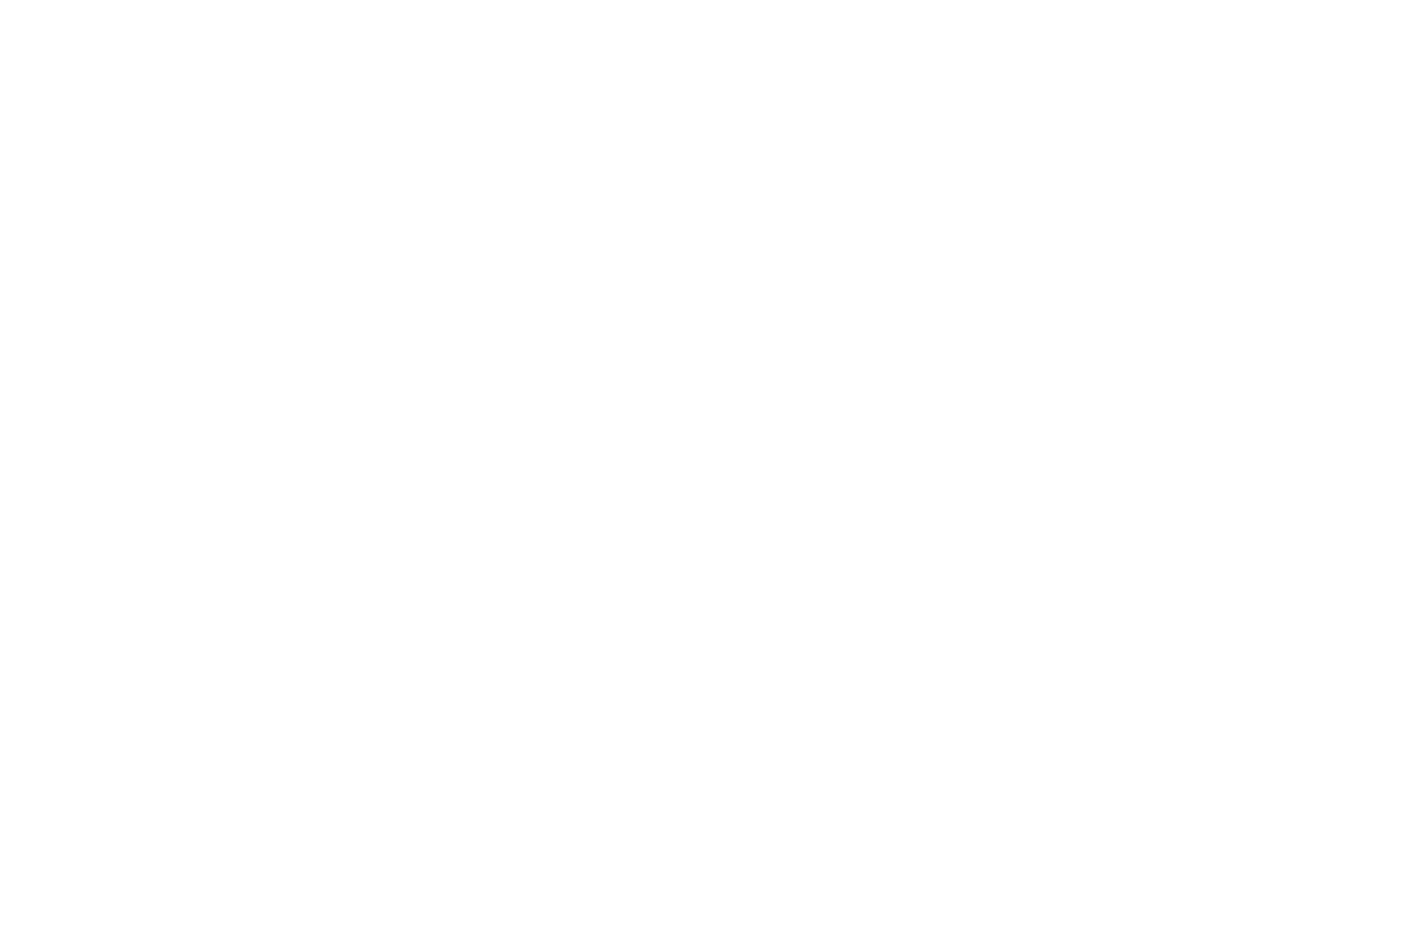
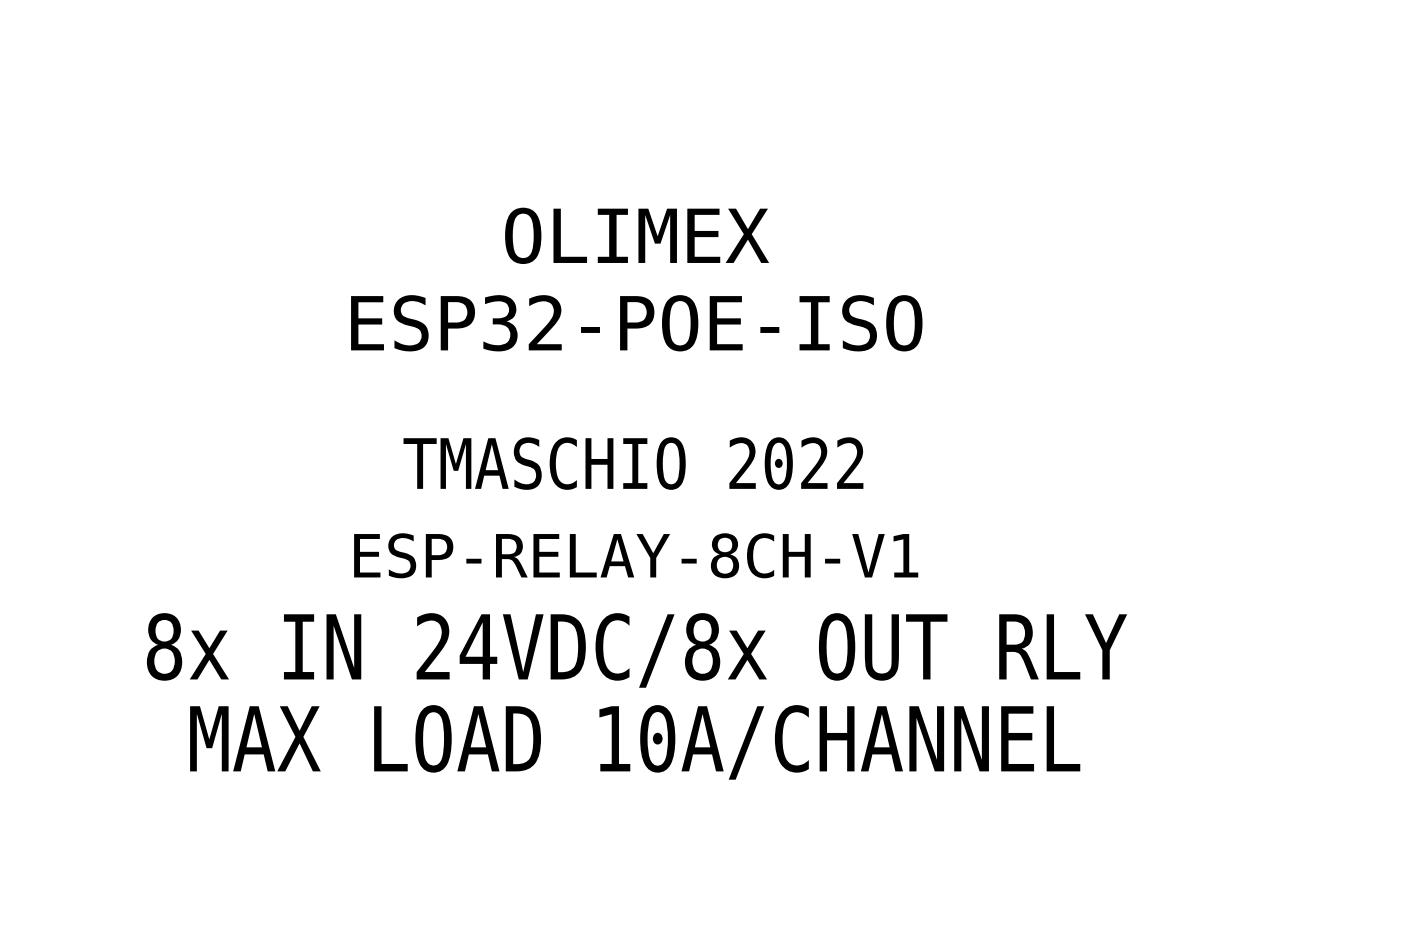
text: none -> OLIMEX (637, 235)
text: none -> ESP32-POE-ISO (636, 323)
text: none -> TMASCHIO 2022 (633, 463)
text: none -> ESP-RELAY-8CH-V1 (636, 555)
text: none -> 8x IN 24VDC/8x OUT RLY (637, 650)
text: none -> MAX LOAD 10A/CHANNEL (635, 742)

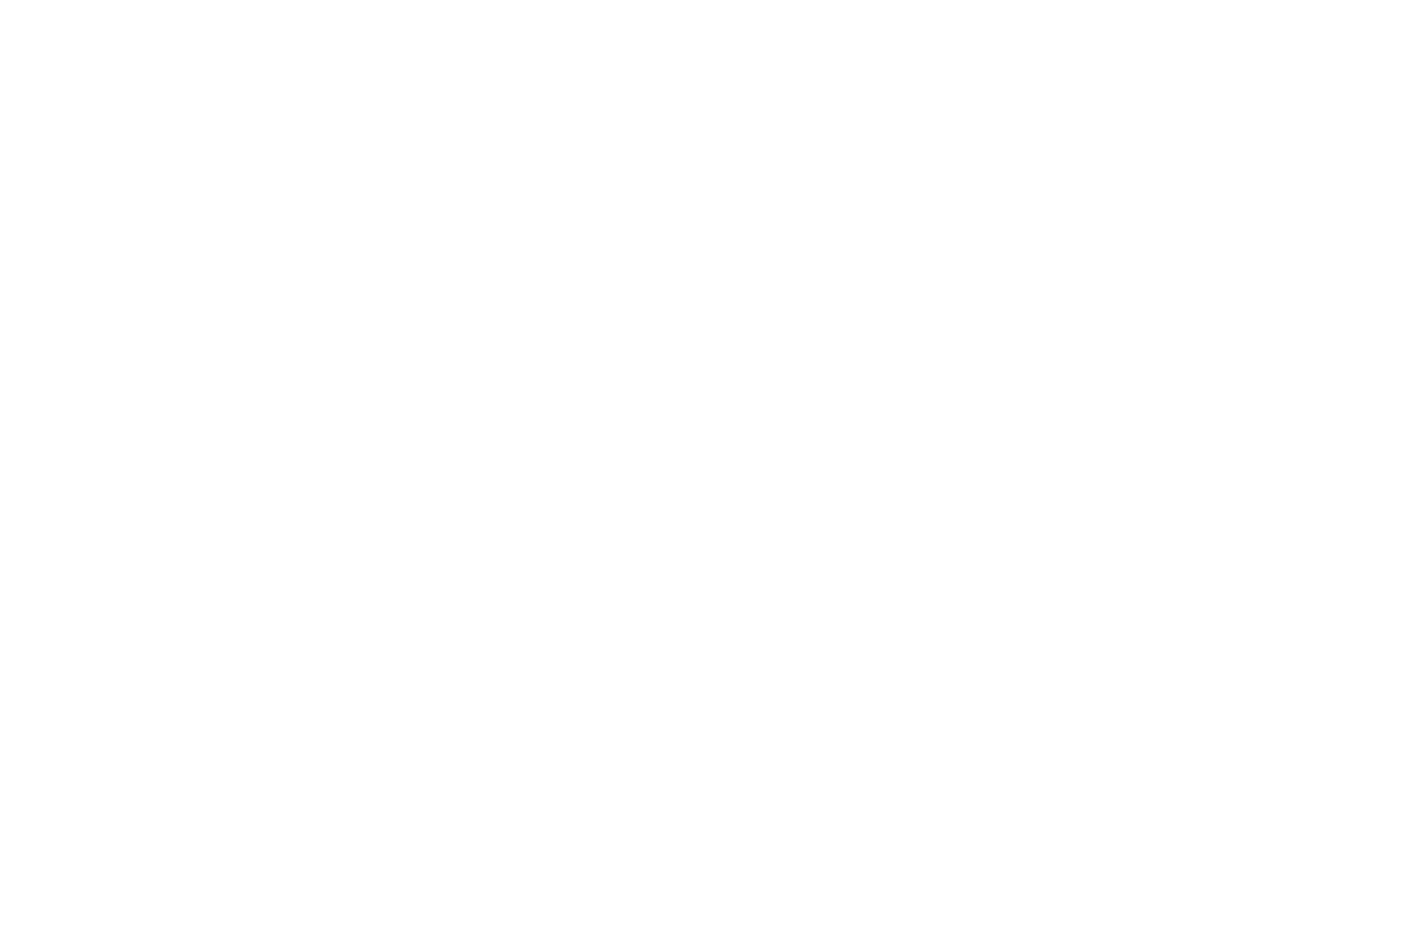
text: OLIMEX (637, 235) -> none
text: ESP32-POE-ISO (636, 323) -> none
text: TMASCHIO 2022 (633, 463) -> none
text: ESP-RELAY-8CH-V1 (636, 555) -> none
text: 8x IN 24VDC/8x OUT RLY (637, 650) -> none
text: MAX LOAD 10A/CHANNEL (635, 742) -> none

